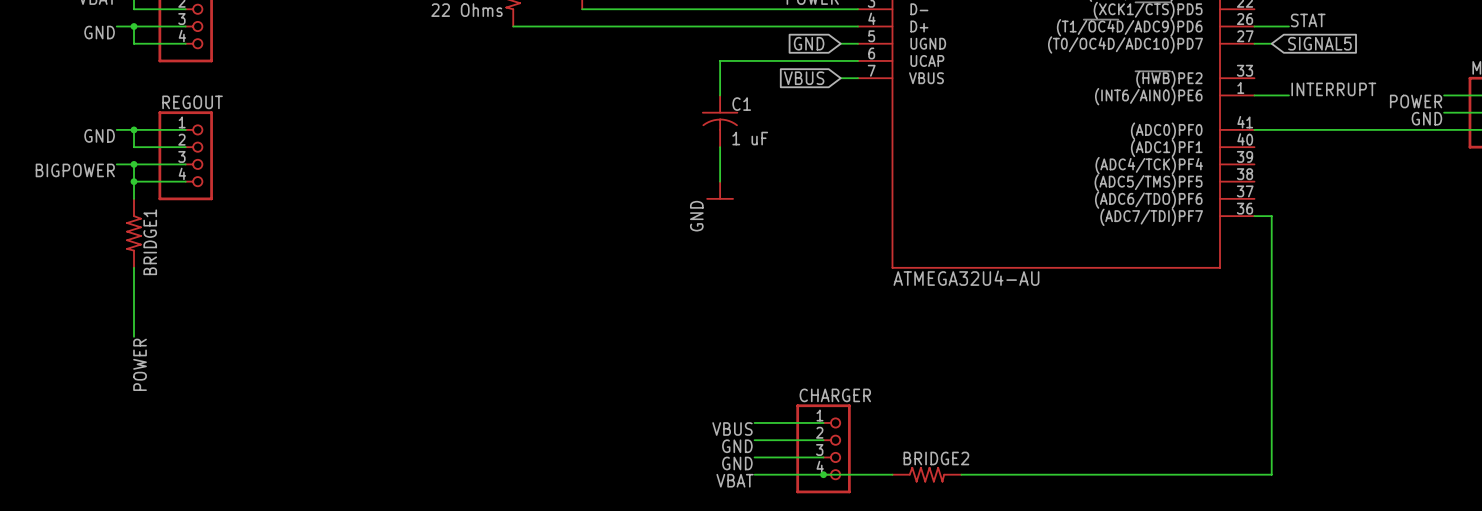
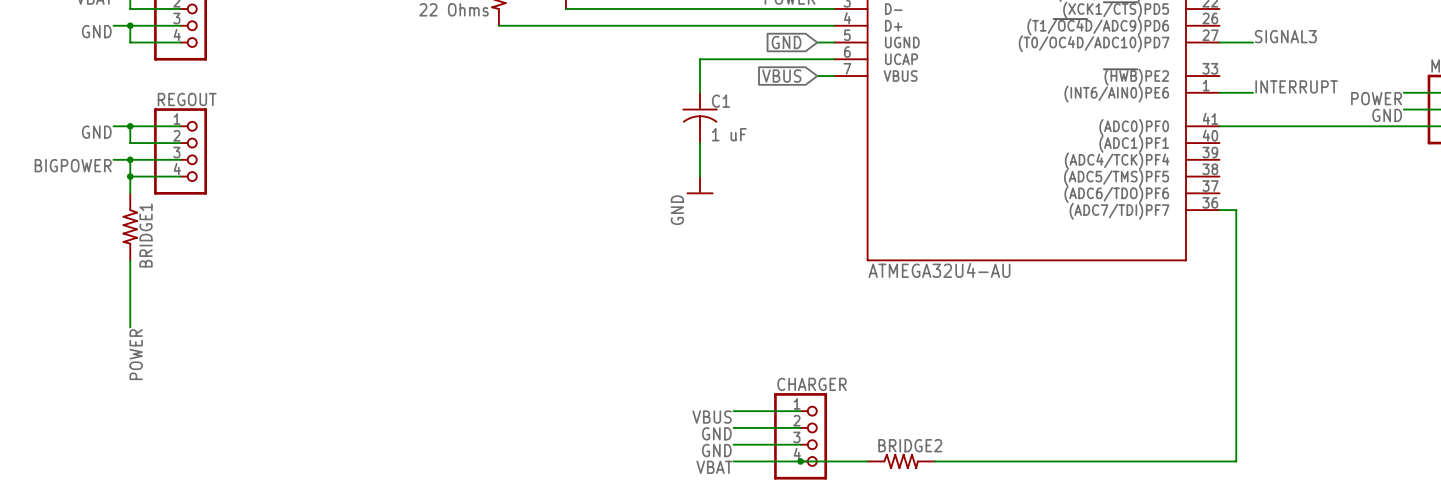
label: STAT (1308, 20) -> none
wire: (1254, 26) (1288, 26) -> none
label: none -> SIGNAL3 (1285, 36)
wire: none -> (1236, 42) (1253, 42)
global label: SIGNAL5 (1319, 43) -> none

